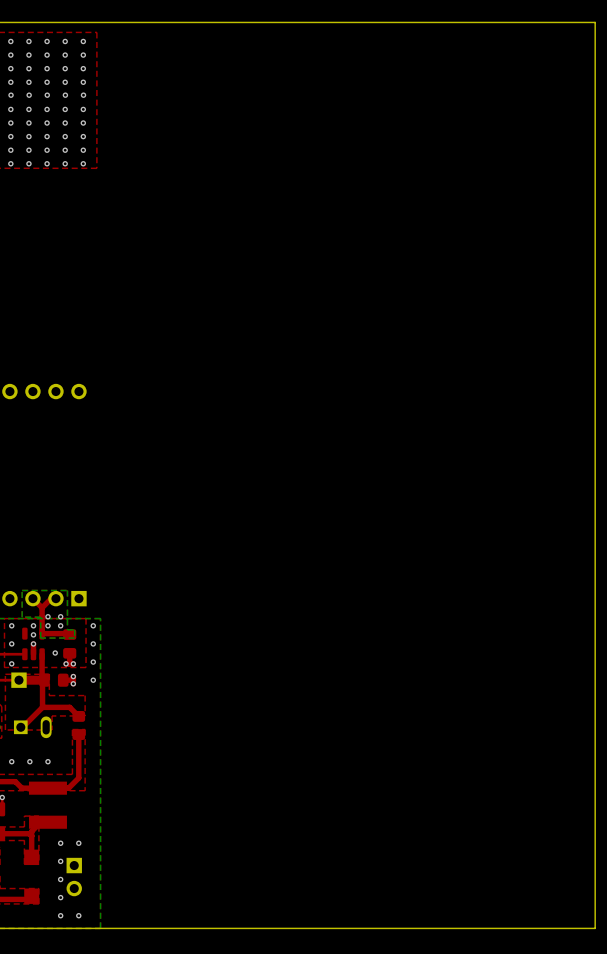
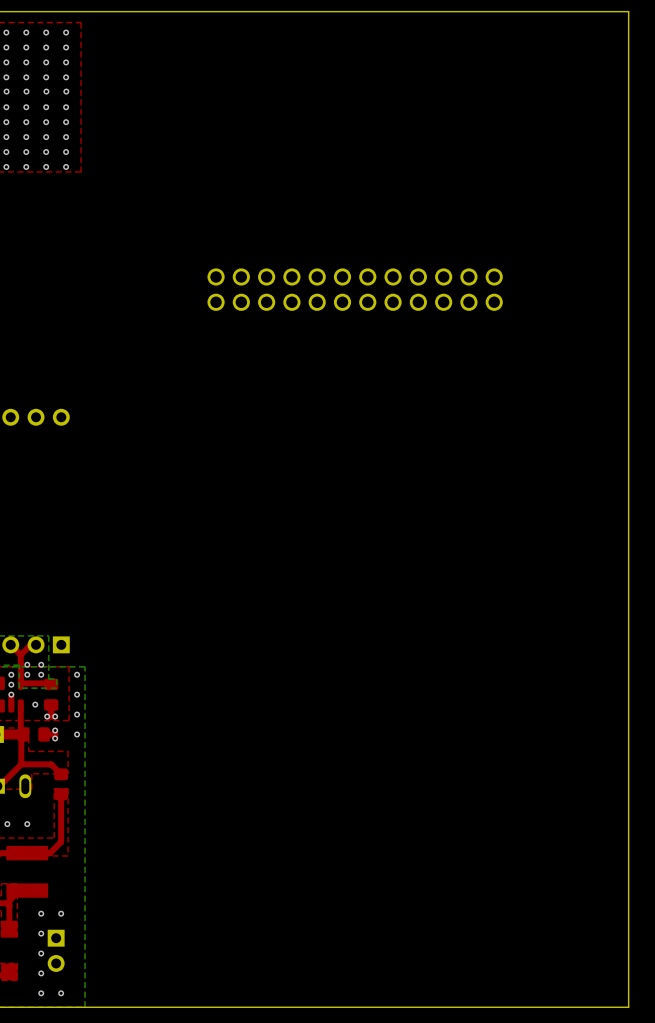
part: none -> (355, 289)

